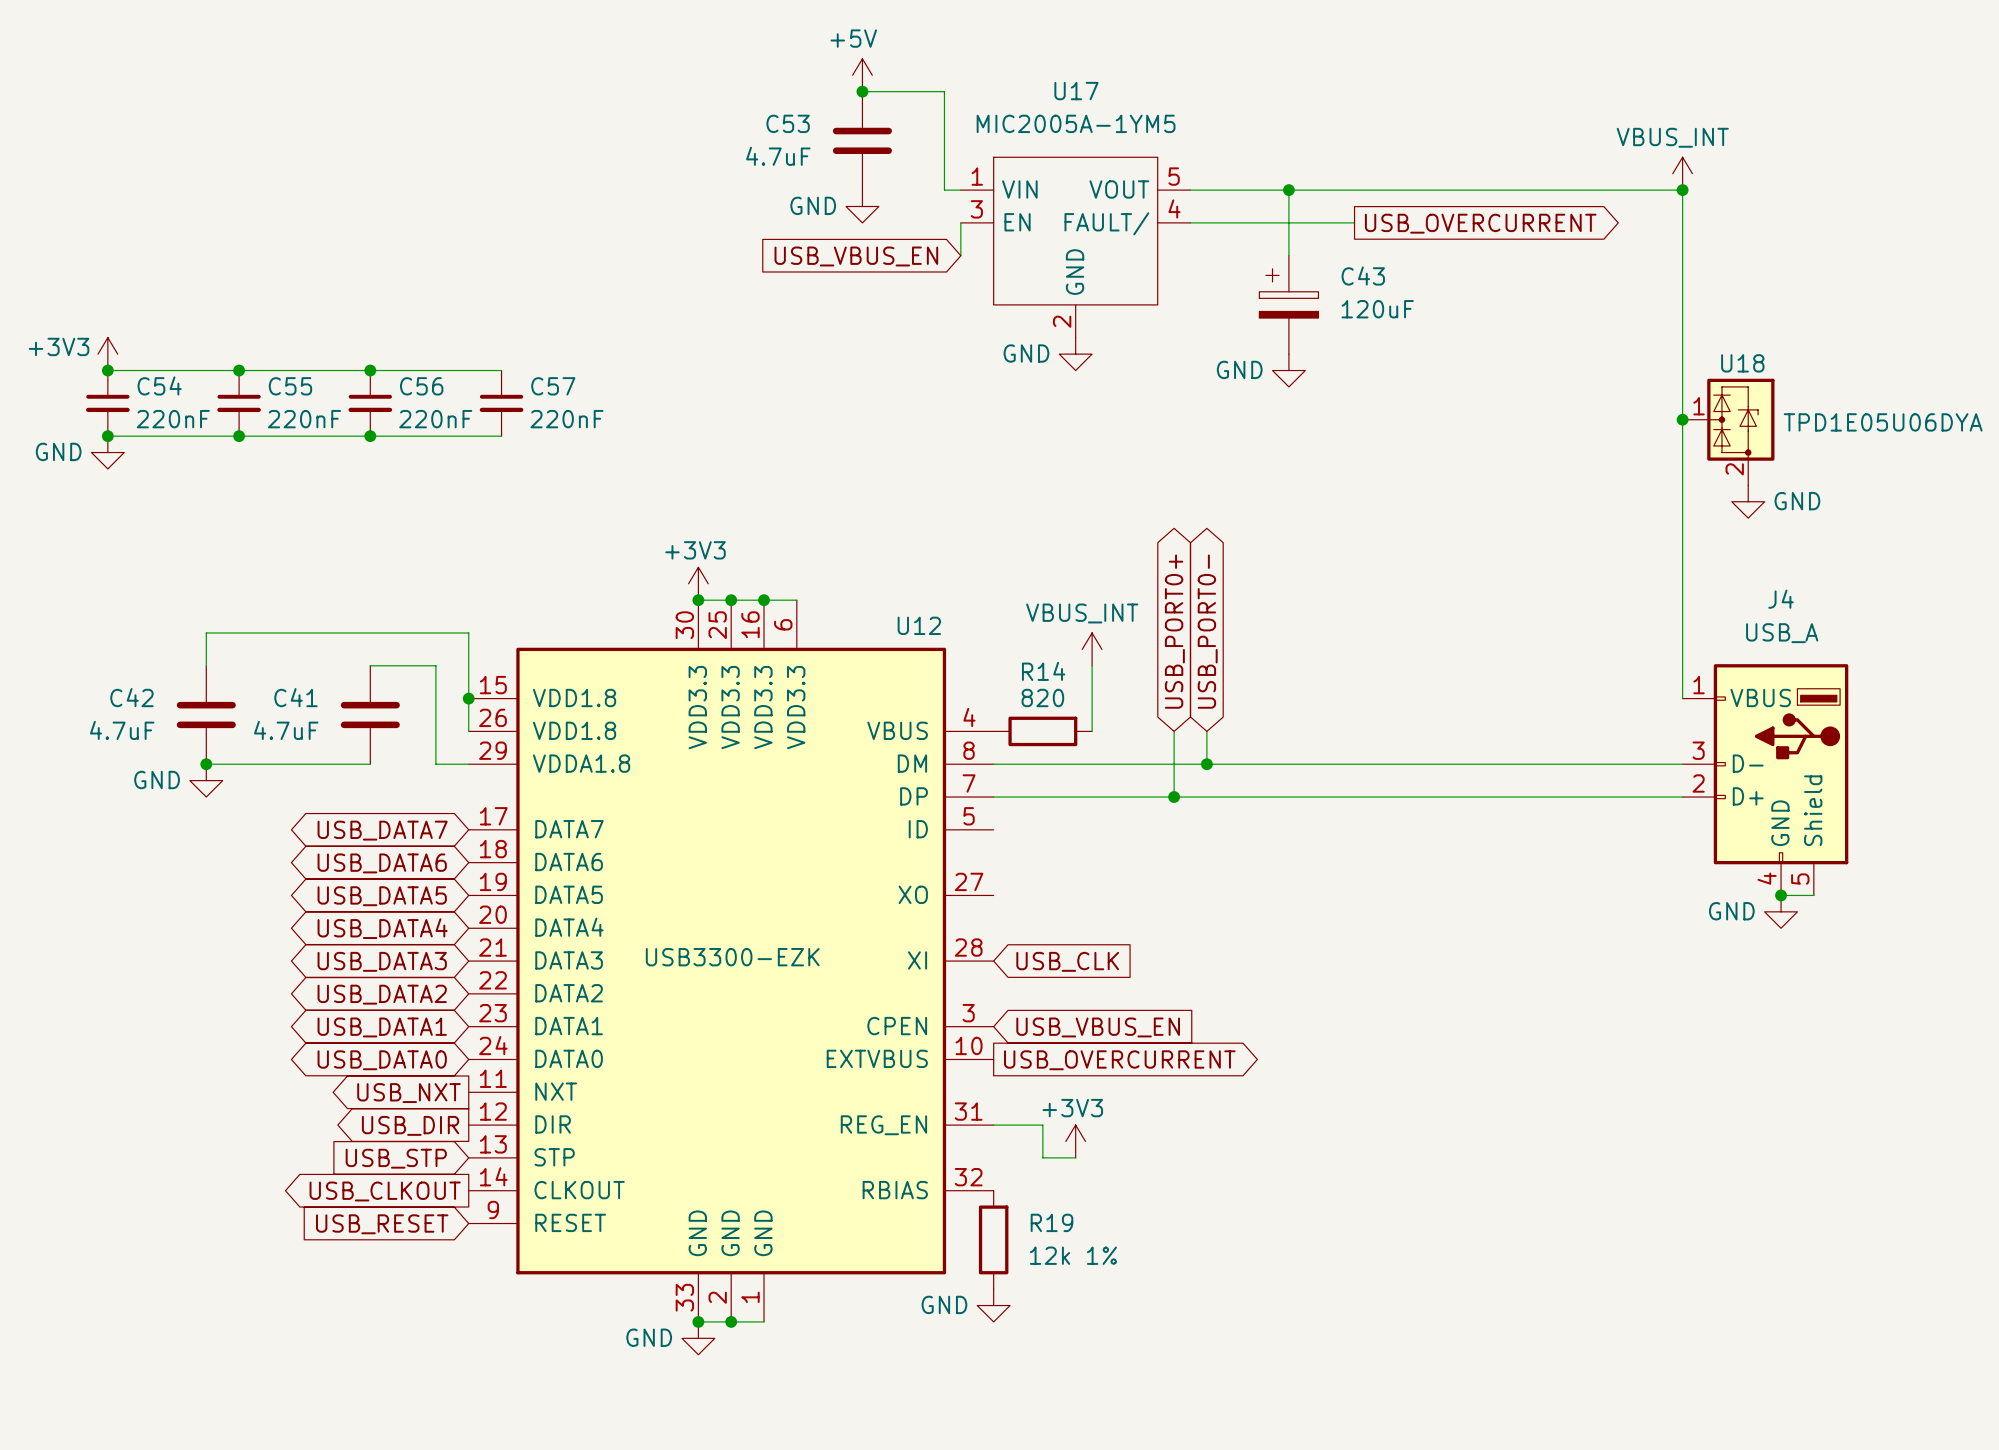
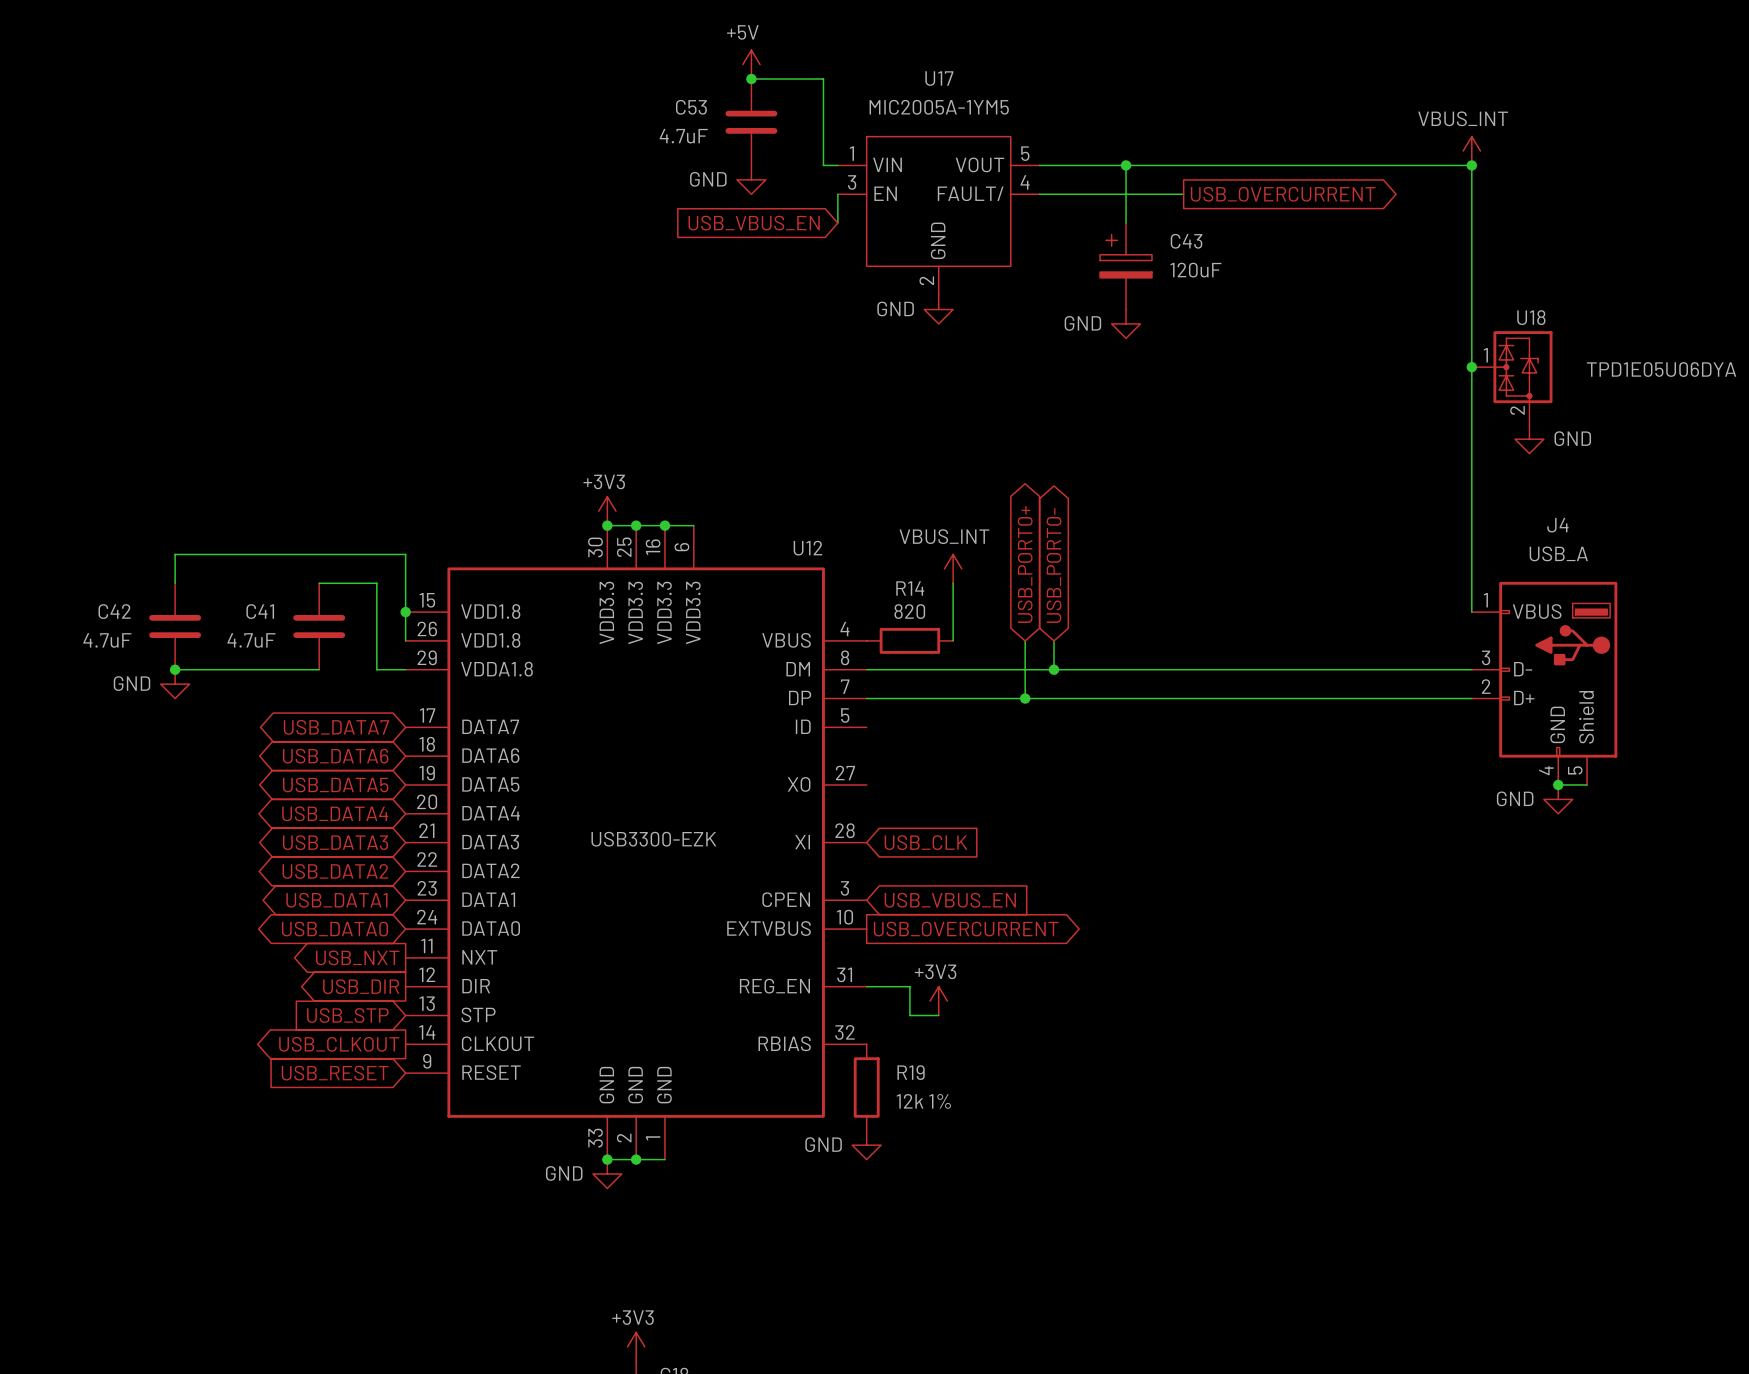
power symbol: +3V3 (107, 354) -> none
wire: (107, 370) (501, 370) -> none
junction: (107, 370) -> none
junction: (239, 370) -> none
junction: (370, 370) -> none
C54: 220nF (107, 403) -> none
C55: 220nF (239, 403) -> none
C56: 220nF (370, 403) -> none
C57: 220nF (501, 403) -> none
wire: (107, 436) (501, 436) -> none
junction: (107, 436) -> none
junction: (239, 436) -> none
junction: (370, 436) -> none
power symbol: GND (107, 452) -> none

